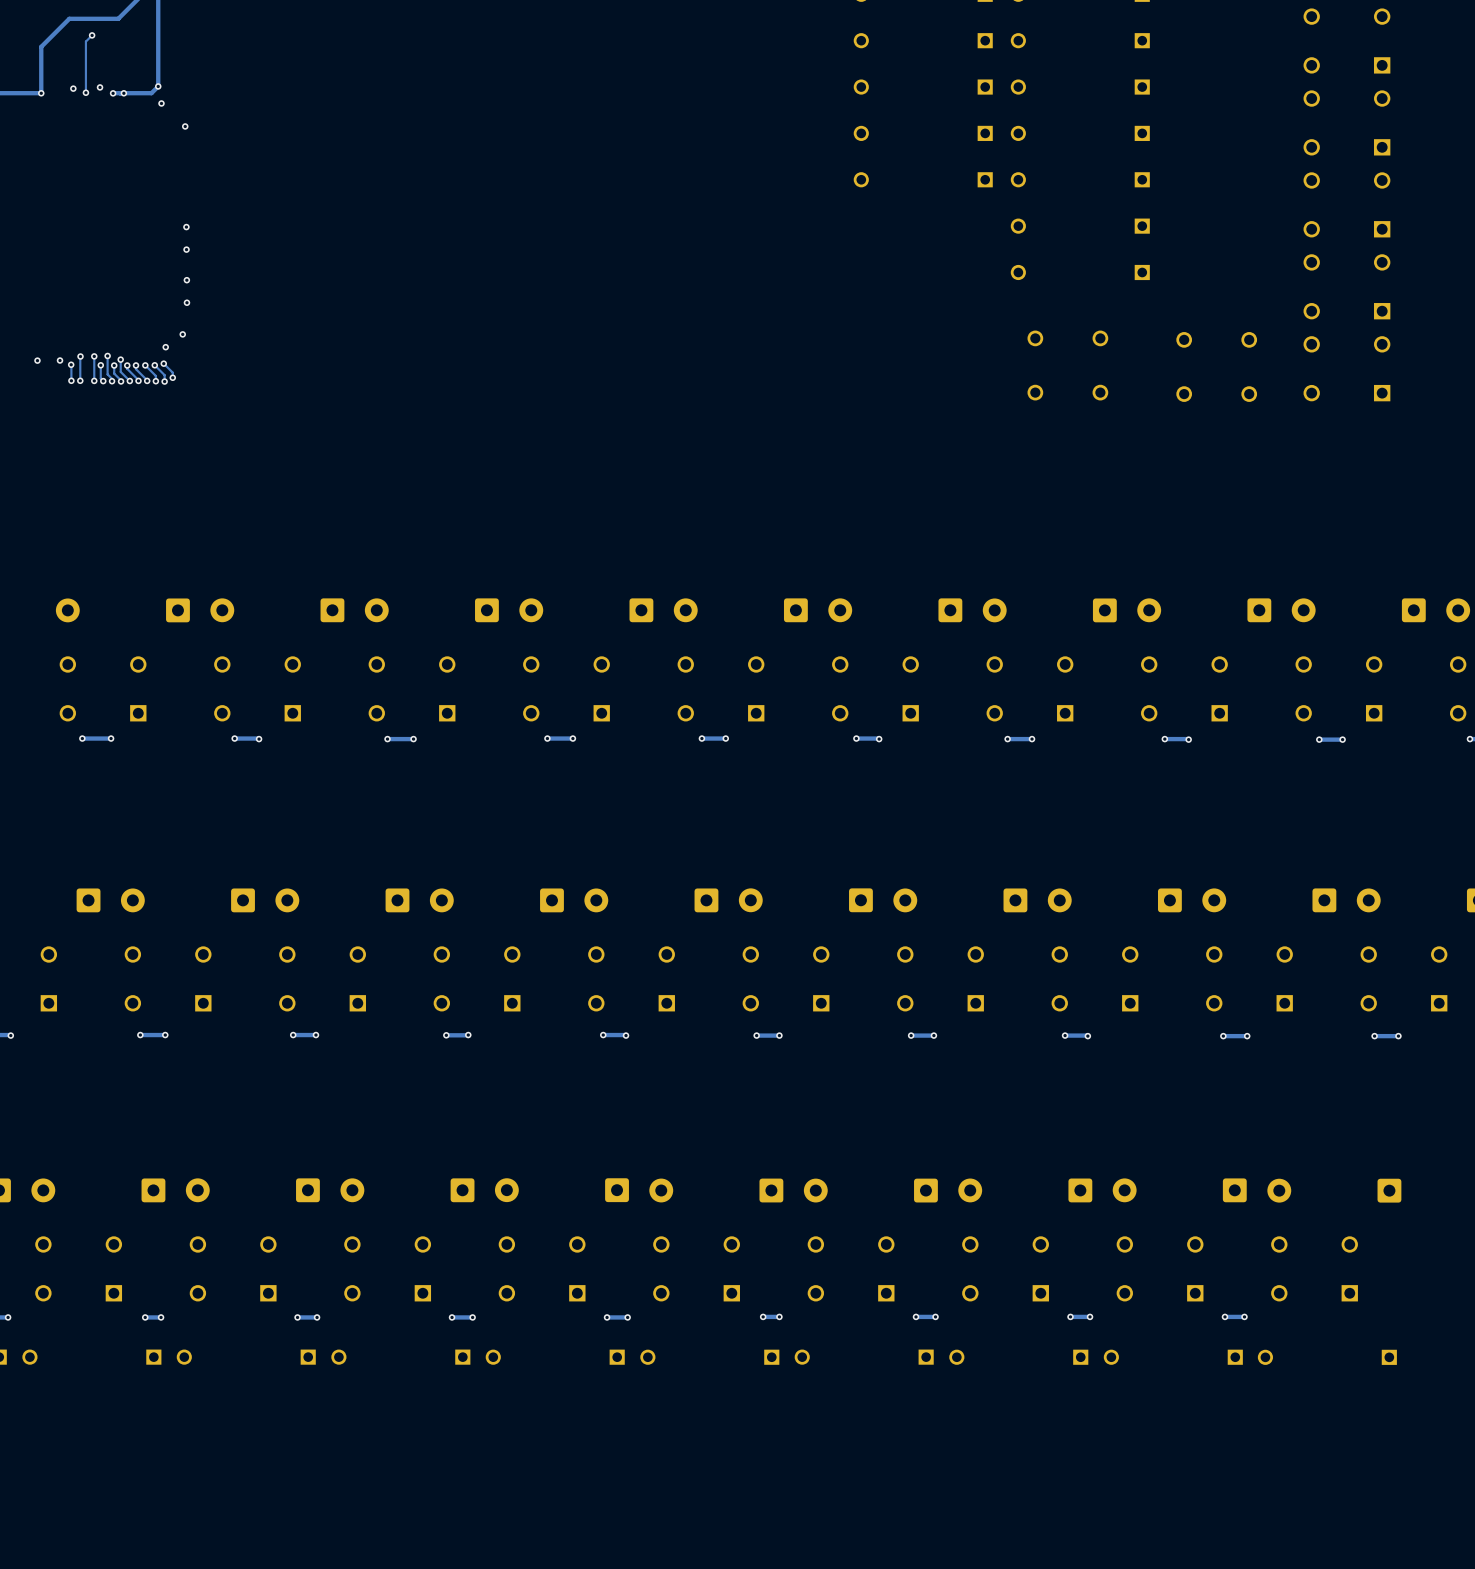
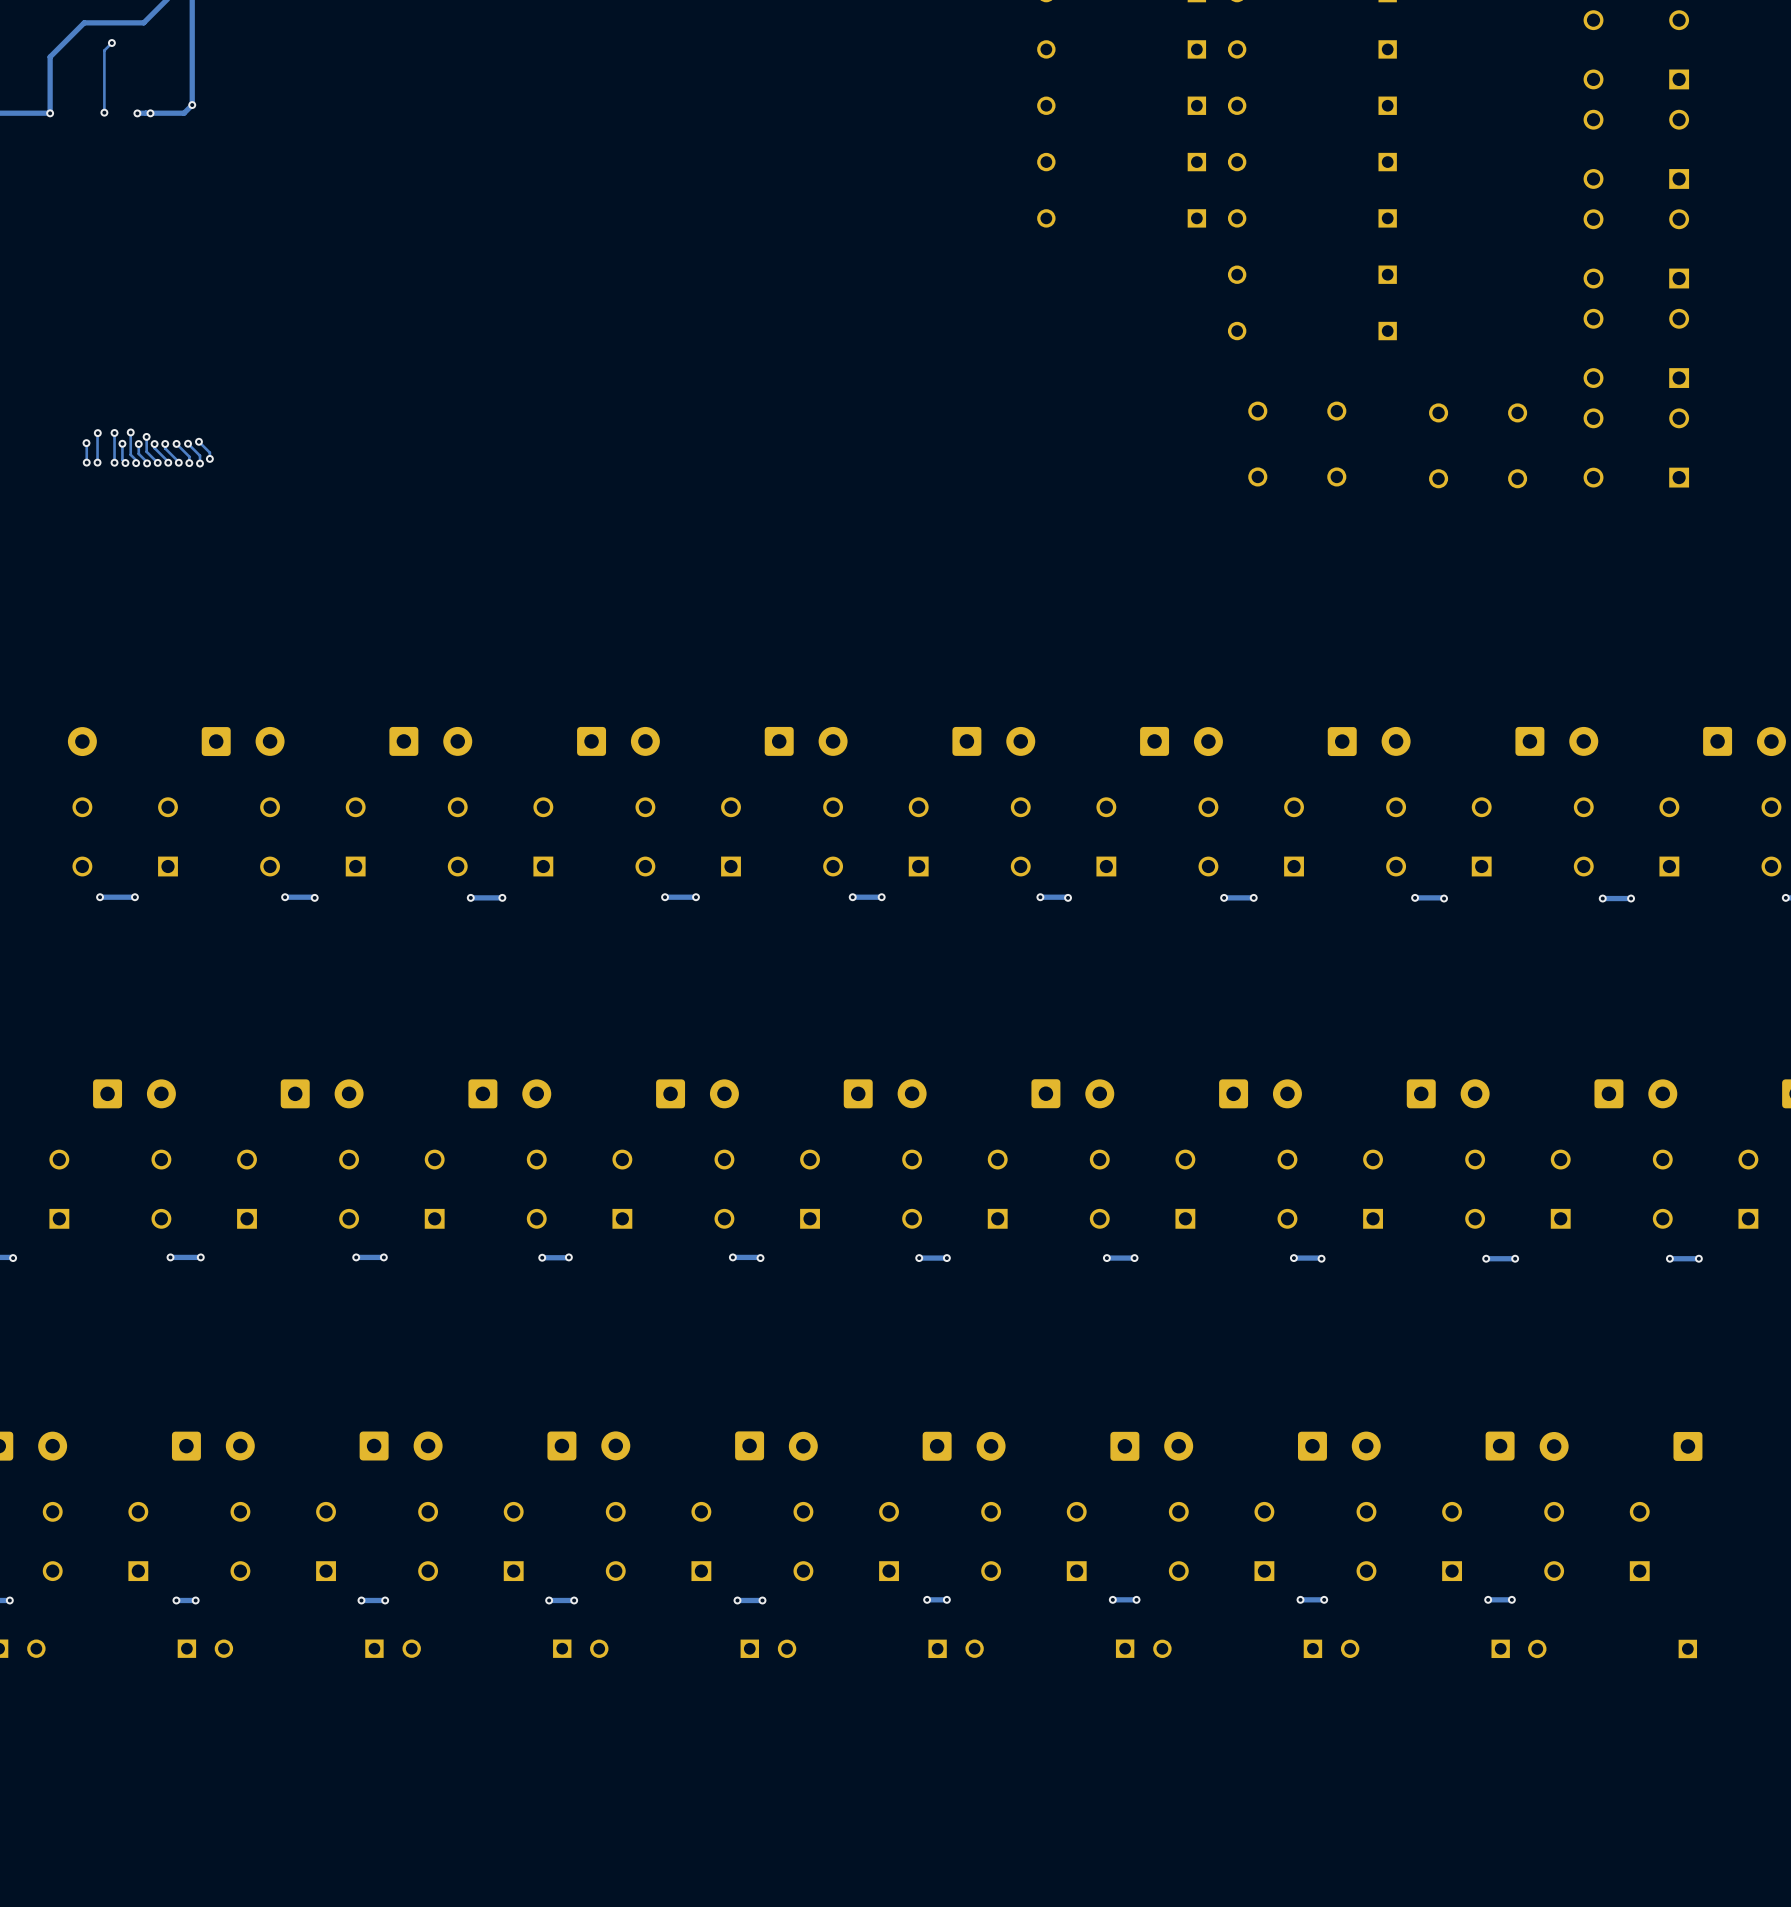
via: (100, 87) -> none
via: (73, 88) -> none
via: (161, 103) -> none
via: (185, 126) -> none
via: (186, 227) -> none
via: (186, 249) -> none
via: (186, 280) -> none
via: (186, 302) -> none
via: (182, 334) -> none
via: (165, 347) -> none
via: (37, 360) -> none
via: (60, 360) -> none

